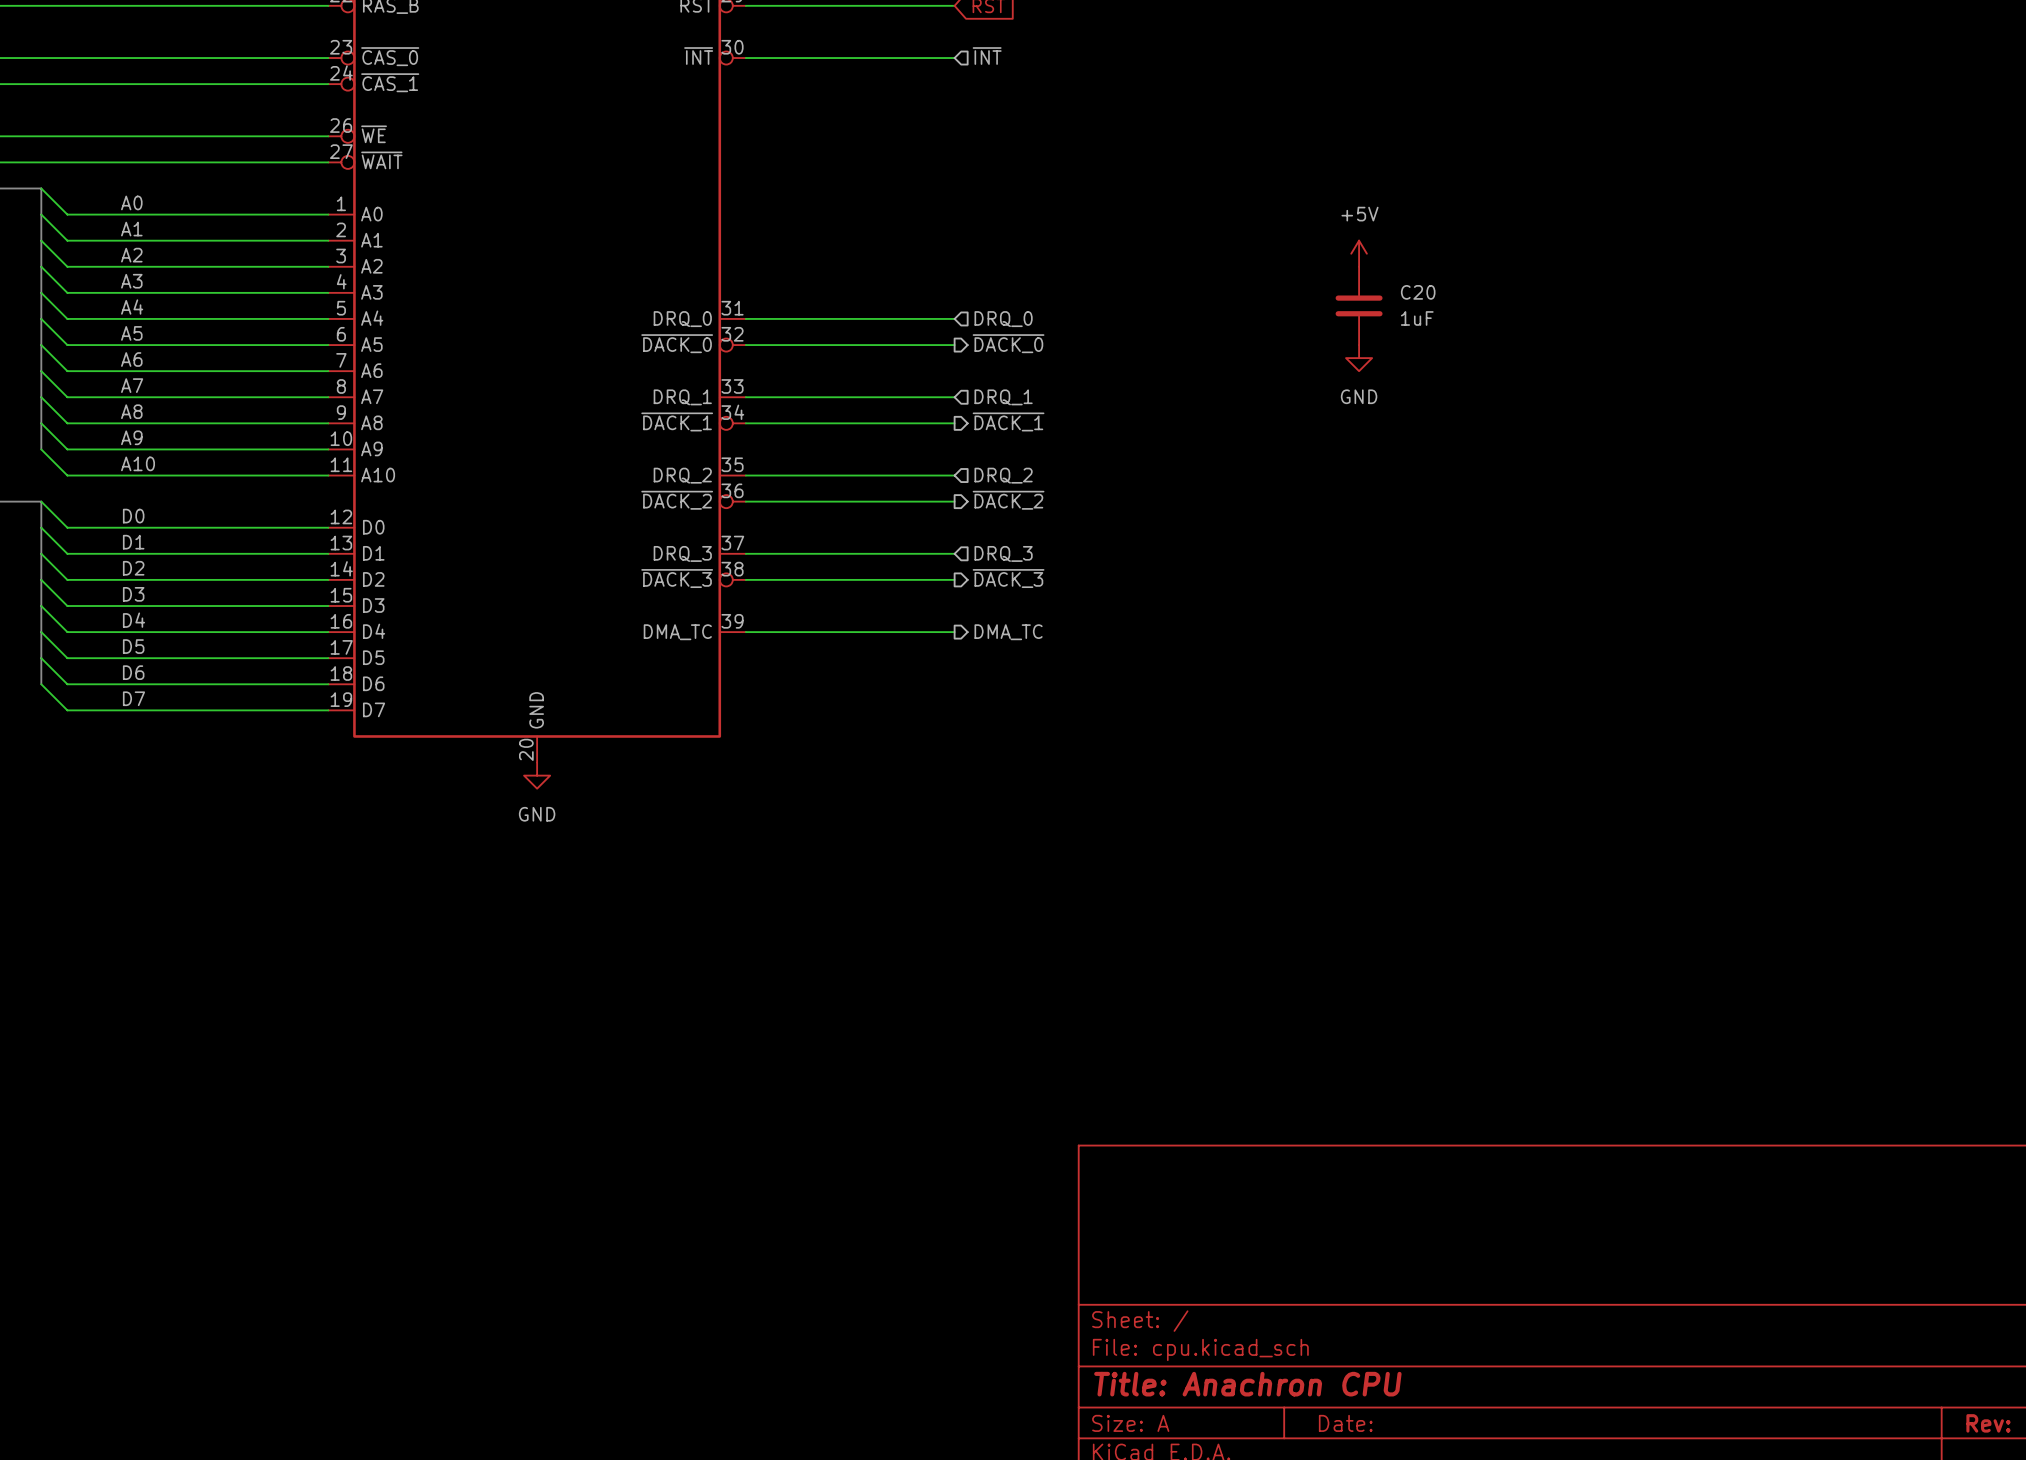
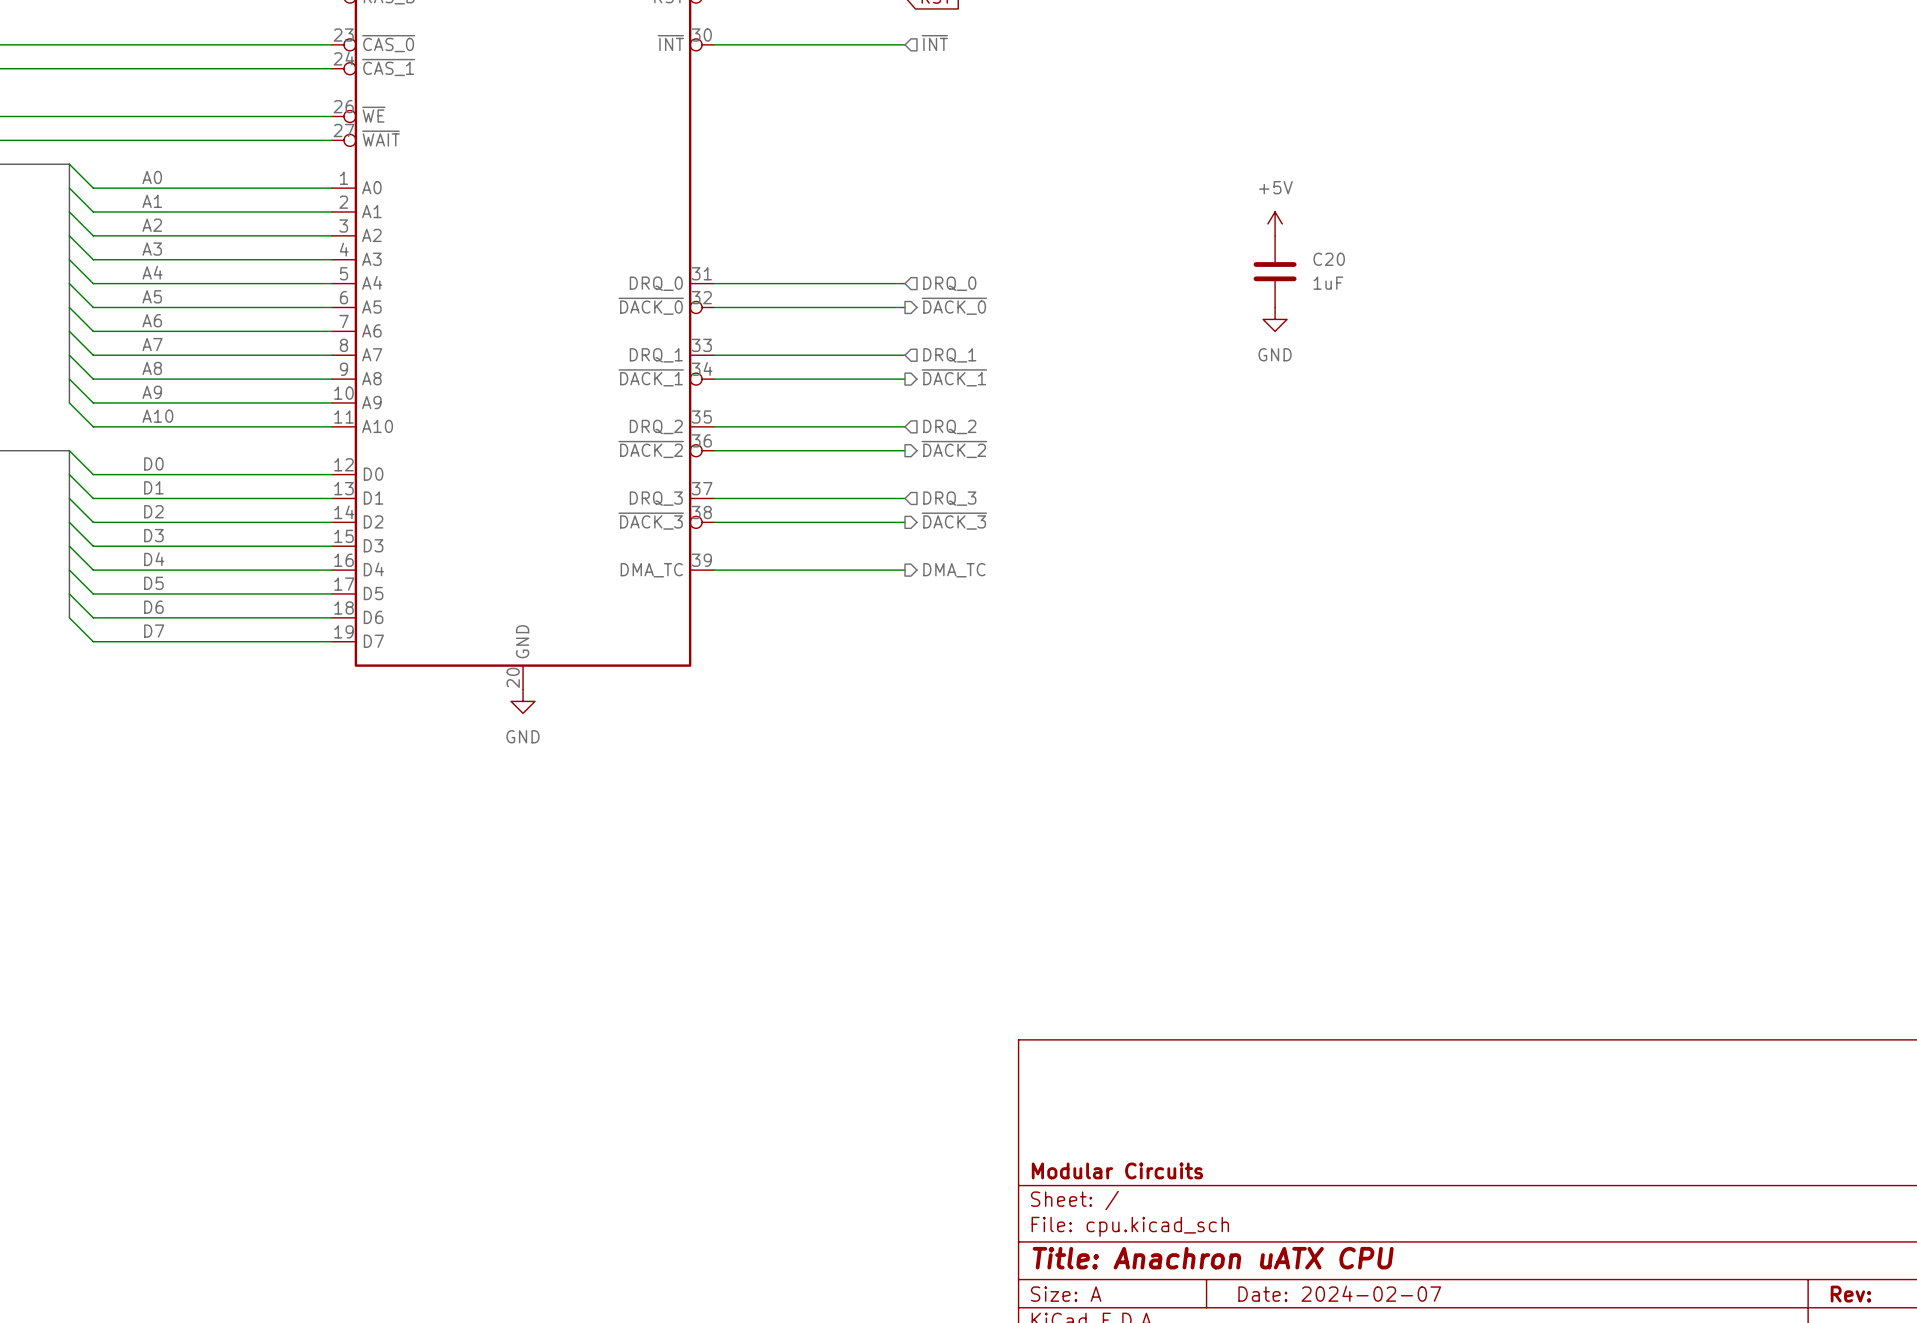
title block: none -> Modular Circuits (1117, 1170)
title block: Title: Anachron CPU (1247, 1384) -> Title: Anachron uATX CPU (1213, 1258)
title block: Date: (1345, 1423) -> Date: 2024-02-07 (1339, 1293)

